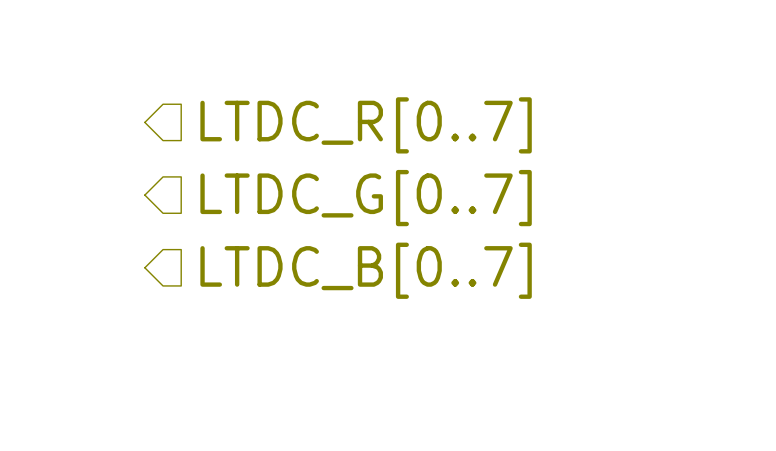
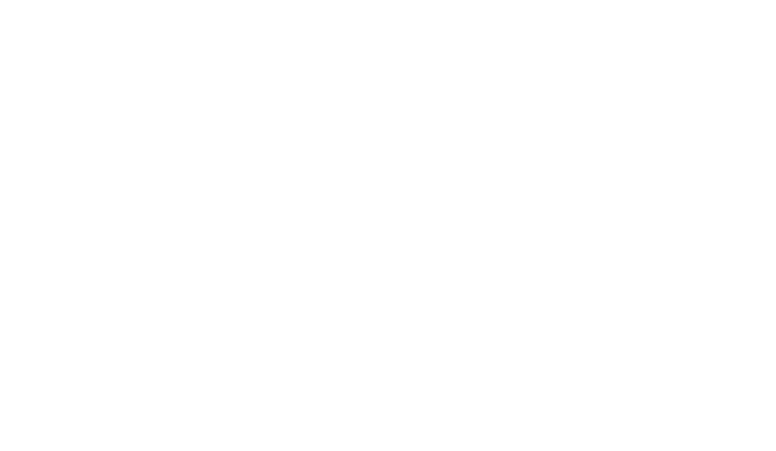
hierarchical label: LTDC_R[0..7] (366, 125) -> none
hierarchical label: LTDC_G[0..7] (366, 198) -> none
hierarchical label: LTDC_B[0..7] (366, 270) -> none

